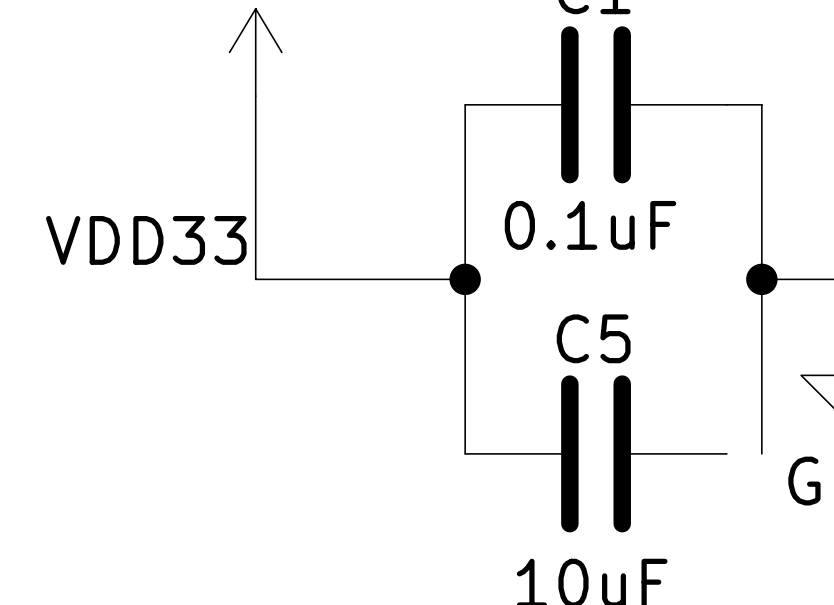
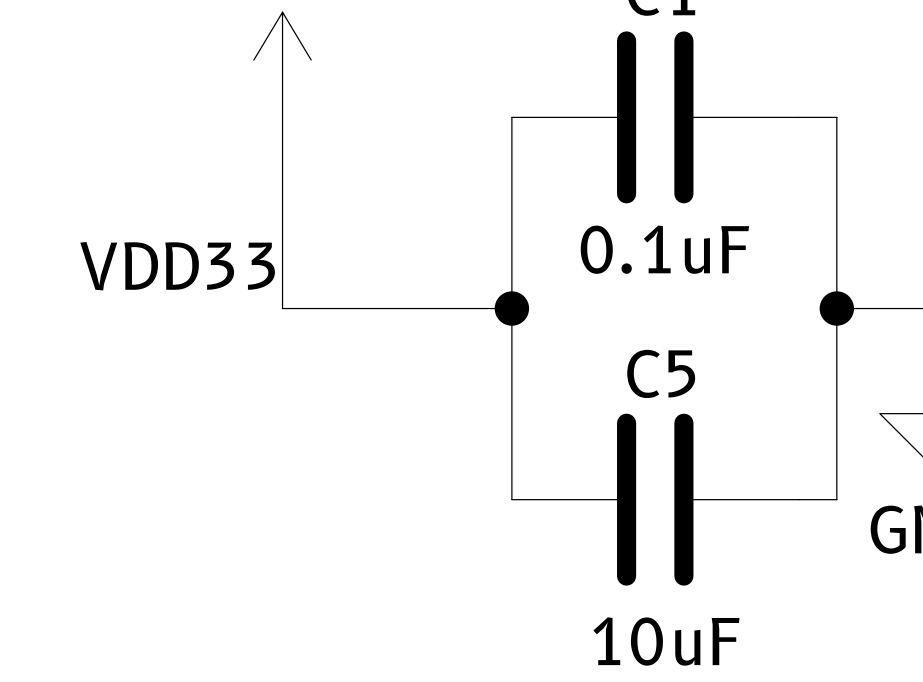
wire: none -> (798, 499) (836, 499)

